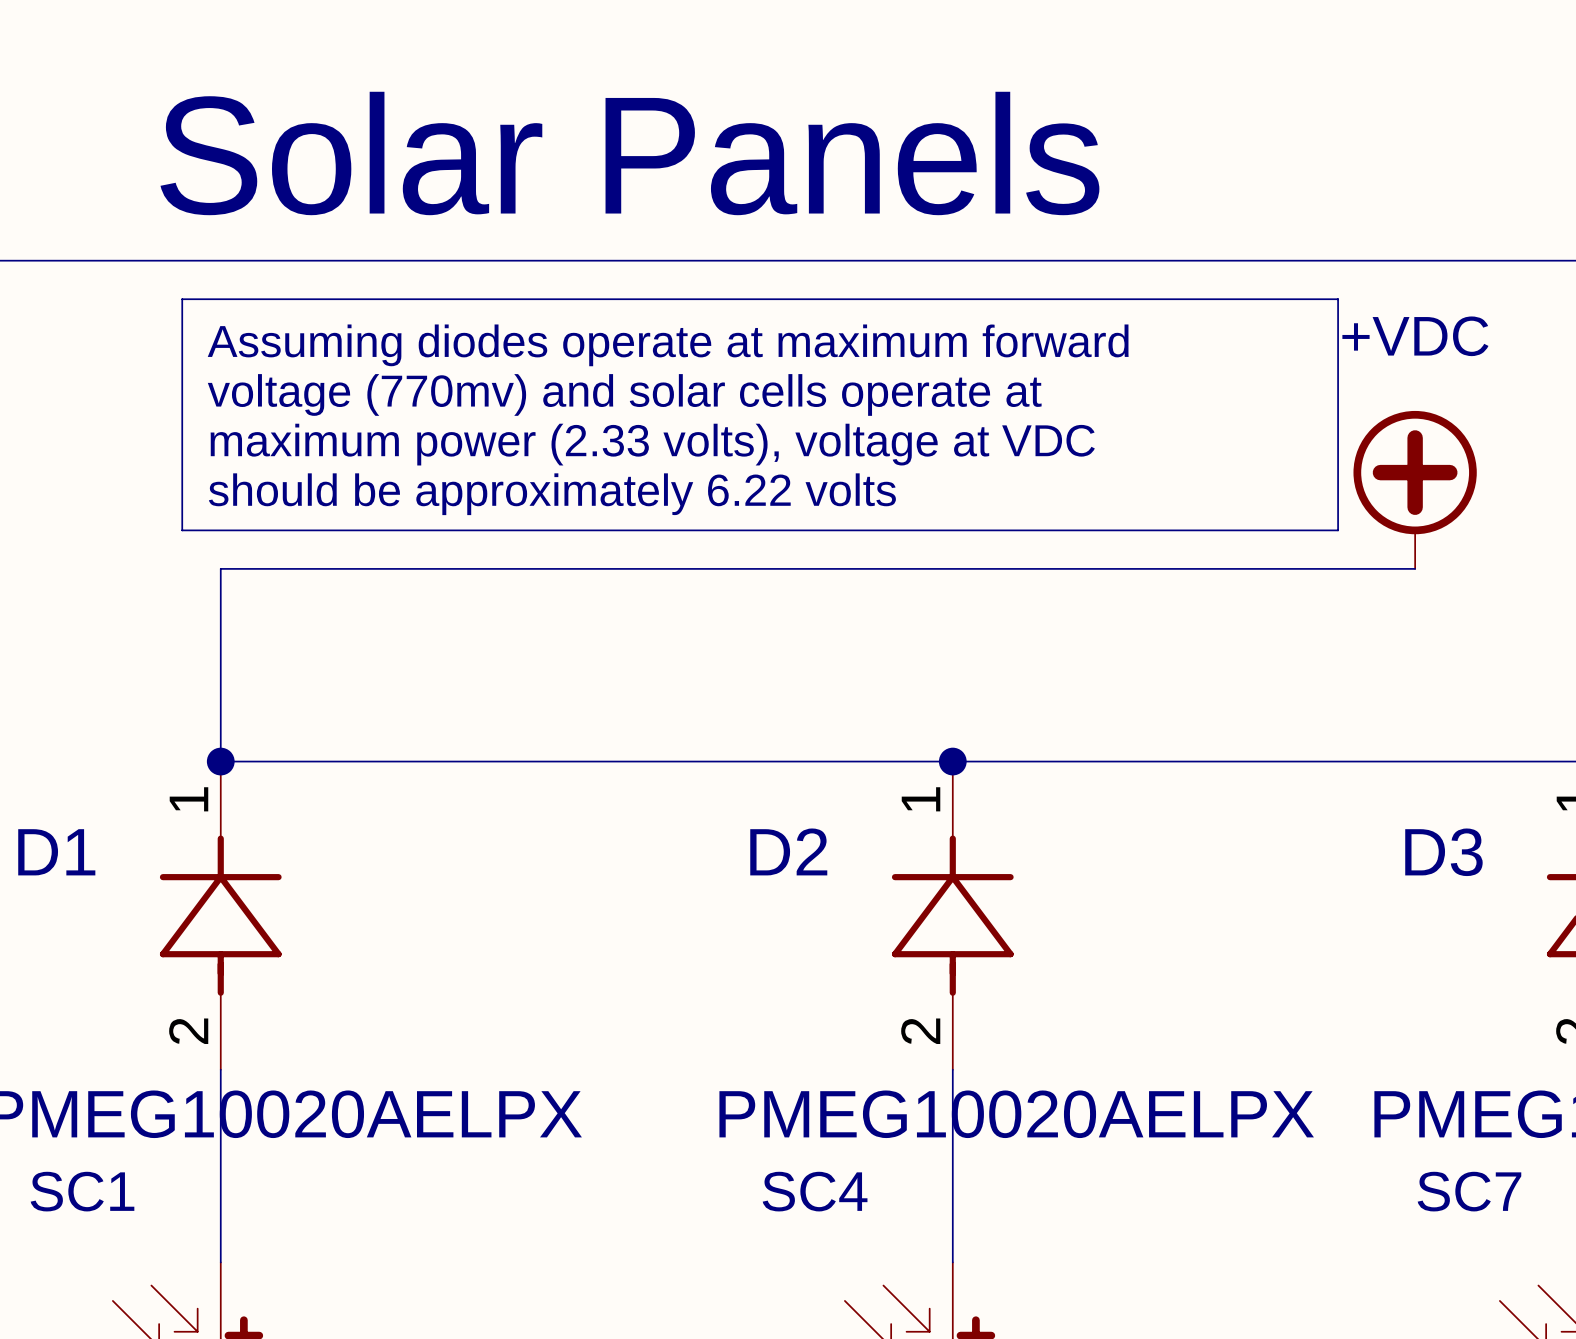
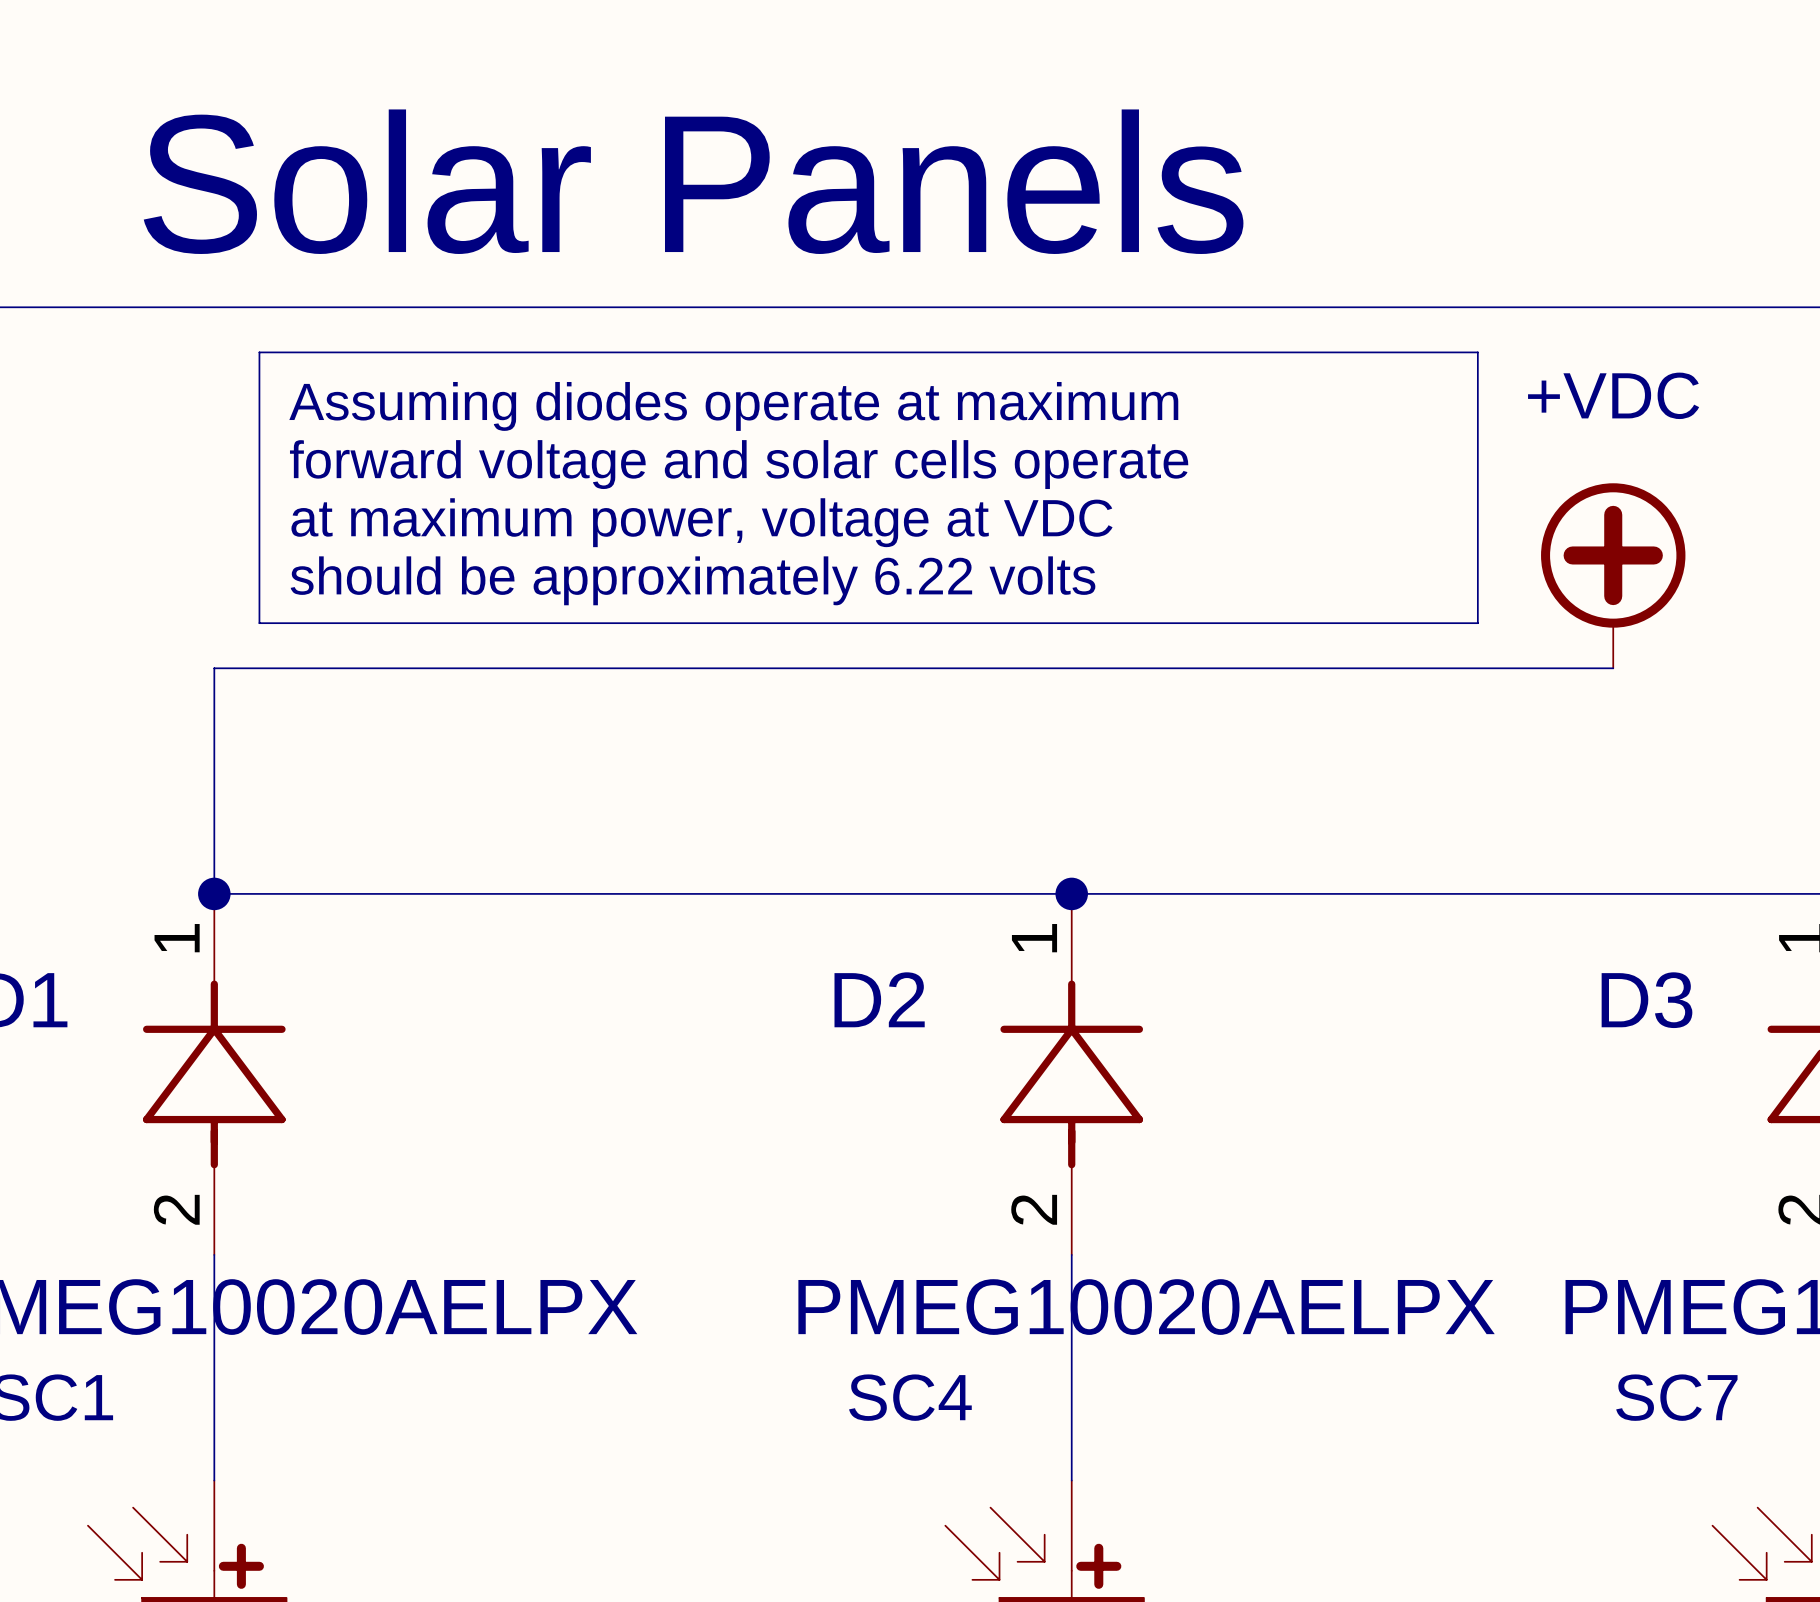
line: (259, 299) (182, 299) (182, 530) (259, 530) -> (259, 352) (259, 623)
line: (1299, 299) (1338, 299) (1338, 530) (1299, 530) -> (1477, 352) (1477, 623)
text: Assuming diodes operate at maximum forward (668, 345) -> Assuming diodes operate at maximum (733, 406)
text: voltage (770mv) and solar cells operate at (624, 394) -> forward voltage and solar cells operate (739, 464)
text: maximum power (2.33 volts), voltage at VDC (652, 444) -> at maximum power, voltage at VDC (702, 522)
text position: should be approximately 6.22 volts (552, 494) -> should be approximately 6.22 volts (693, 580)

